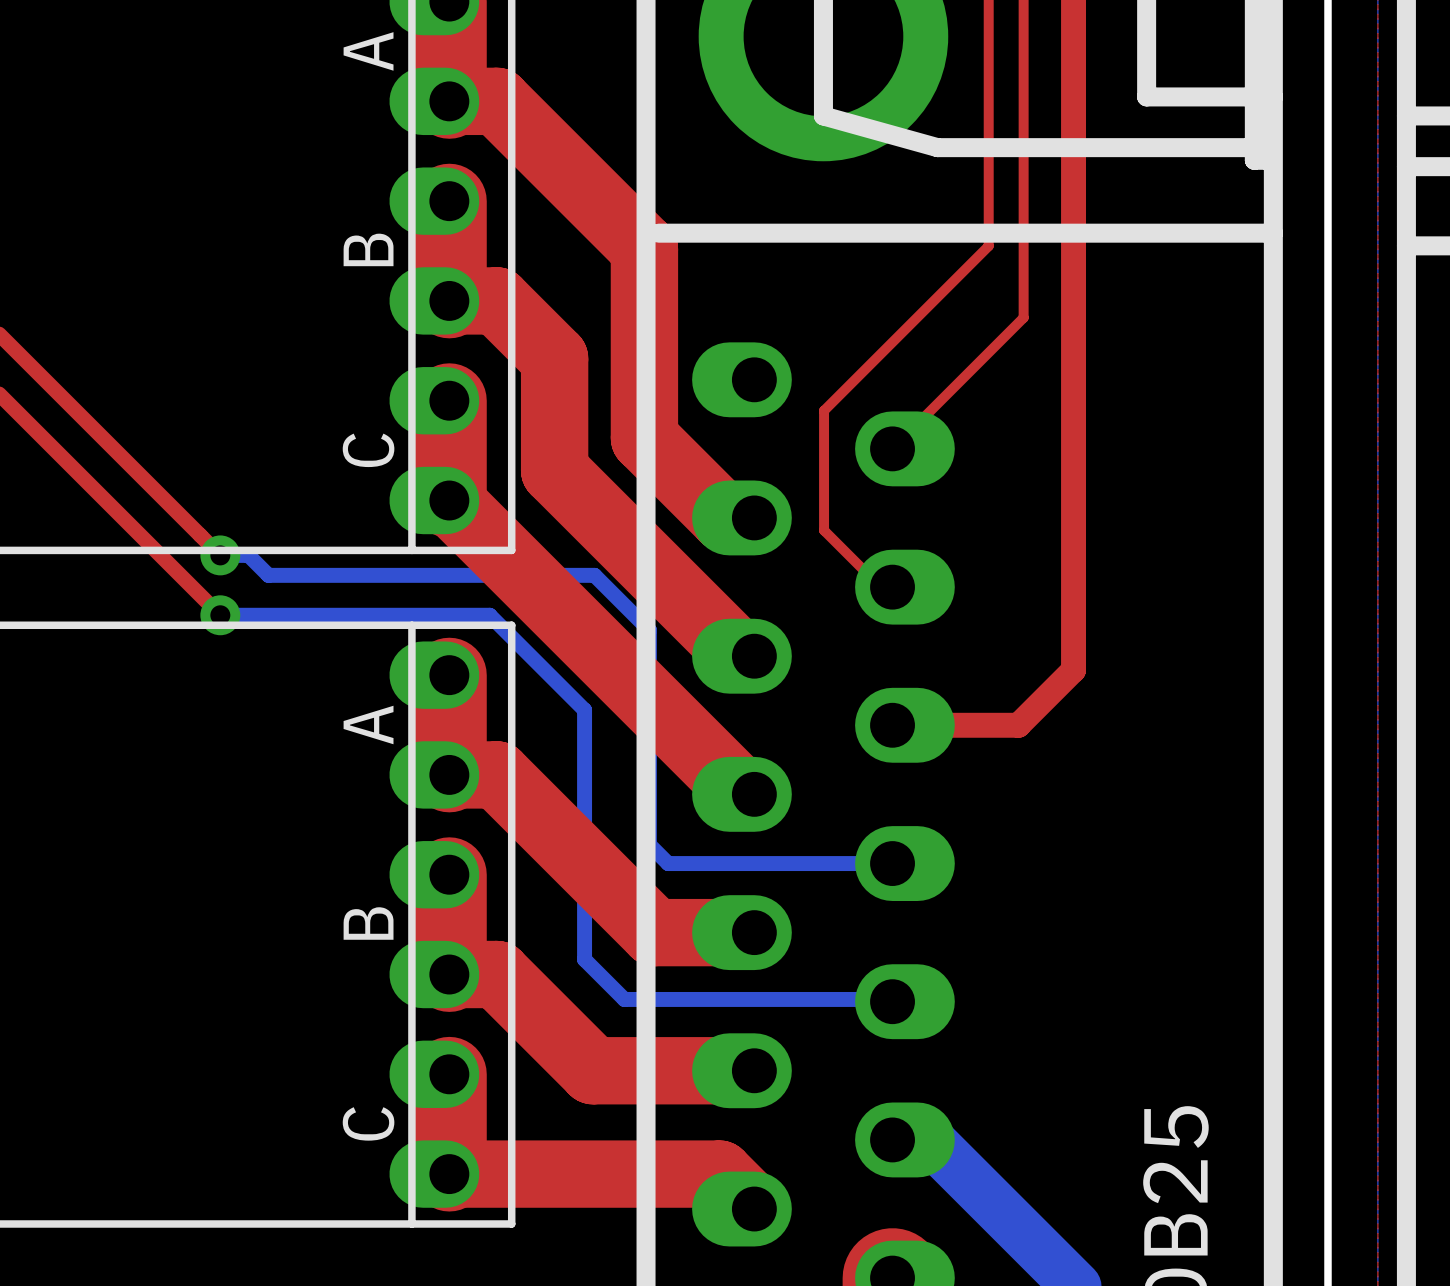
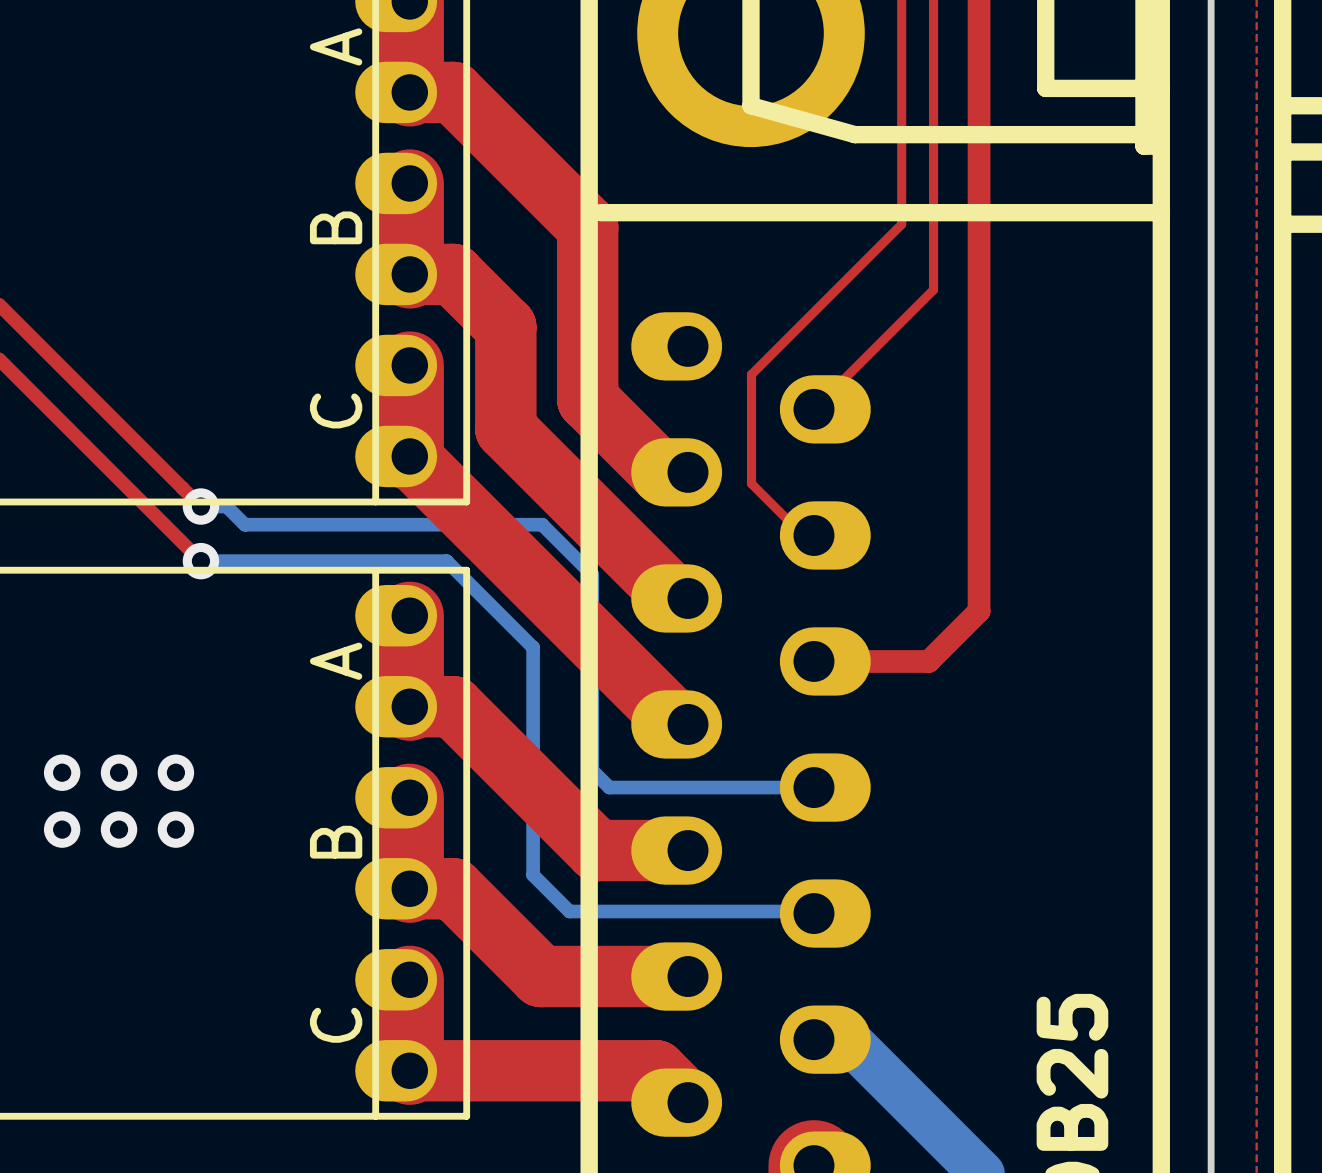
via: none -> (62, 772)
via: none -> (119, 772)
via: none -> (175, 772)
via: none -> (62, 829)
via: none -> (119, 829)
via: none -> (175, 829)

